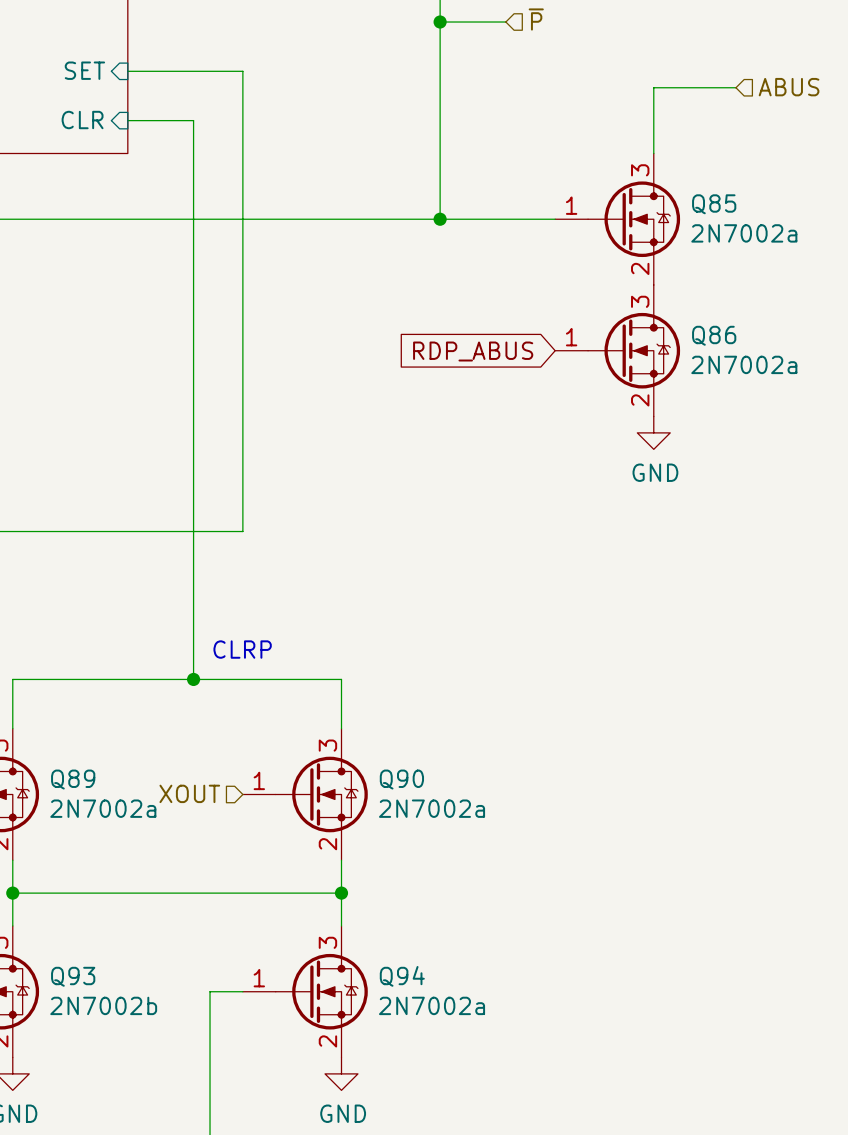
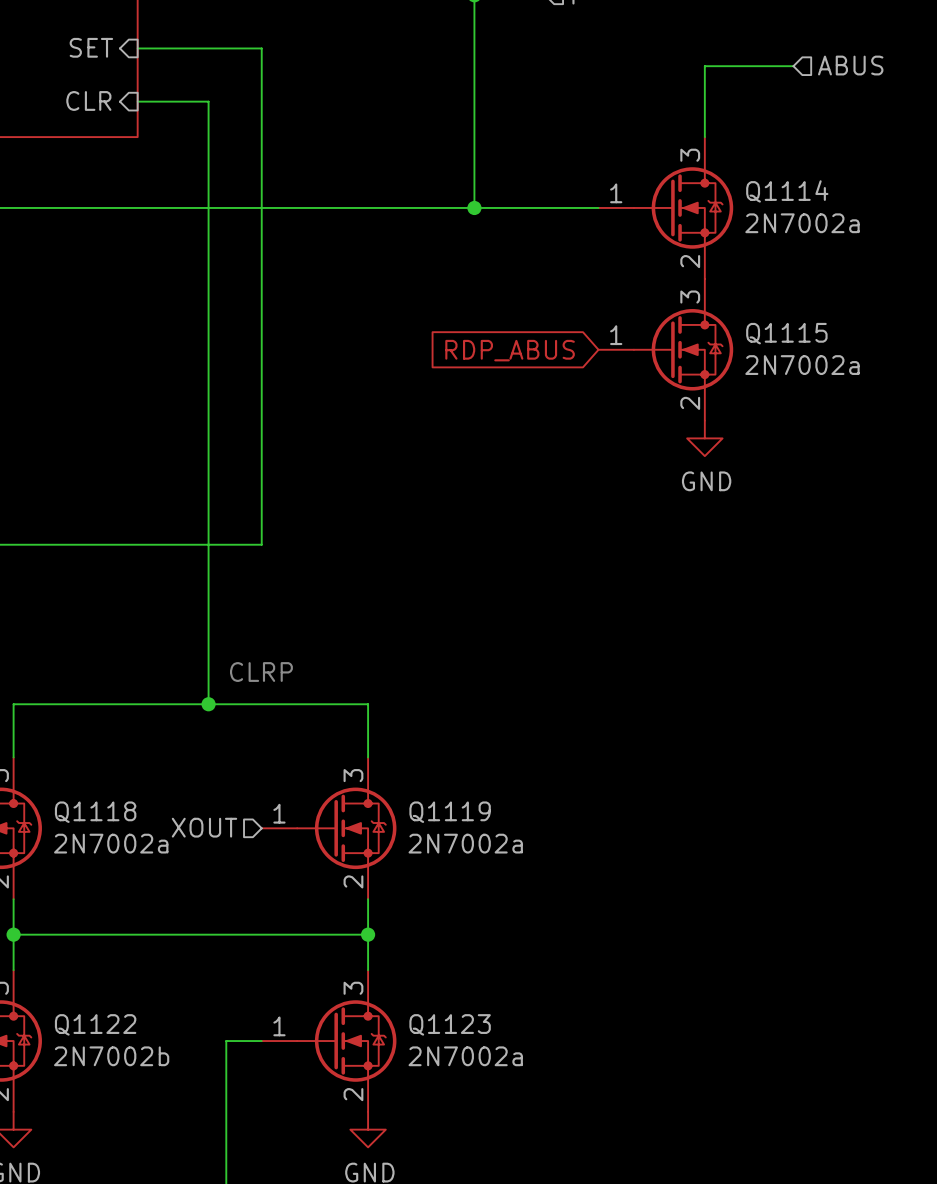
Q85 name: Q85 (714, 204) -> Q1114 (787, 191)
Q86 name: Q86 (714, 335) -> Q1115 (786, 333)
Q89 name: Q89 (73, 779) -> Q1118 (95, 812)
Q90 name: Q90 (401, 779) -> Q1119 (450, 812)
Q93 name: Q93 (73, 976) -> Q1122 (95, 1024)
Q94 name: Q94 (402, 976) -> Q1123 (450, 1024)

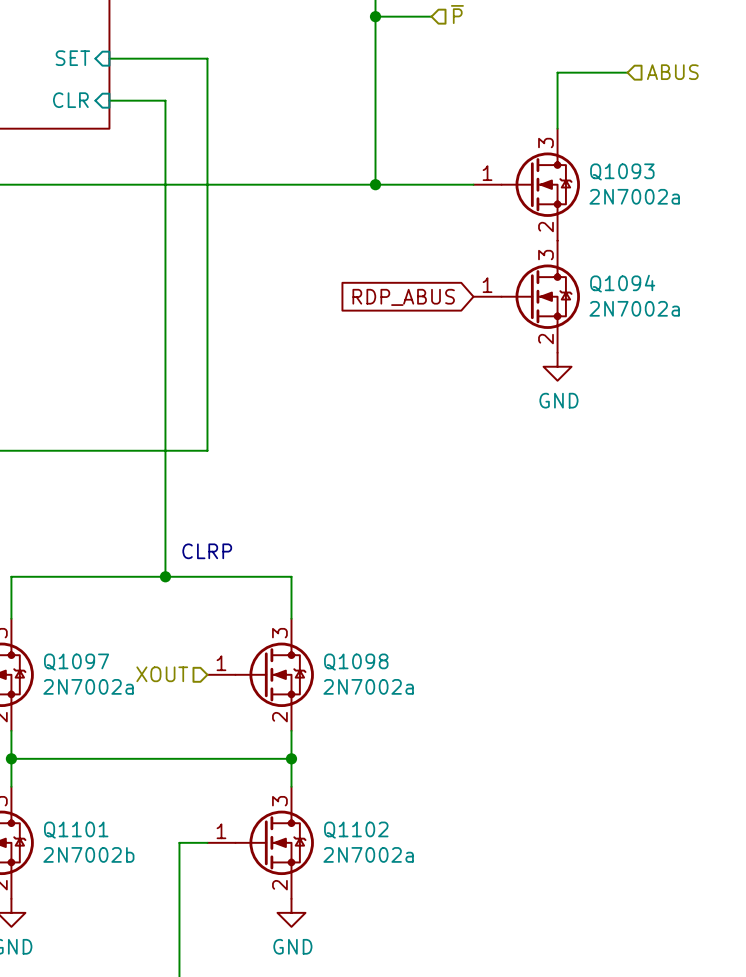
Q1114 name: Q1114 (787, 191) -> Q1093 (622, 171)
Q1115 name: Q1115 (786, 333) -> Q1094 (622, 283)
Q1118 name: Q1118 (95, 812) -> Q1097 (76, 662)
Q1119 name: Q1119 (450, 812) -> Q1098 (356, 662)
Q1122 name: Q1122 (95, 1024) -> Q1101 (76, 830)
Q1123 name: Q1123 (450, 1024) -> Q1102 (356, 830)

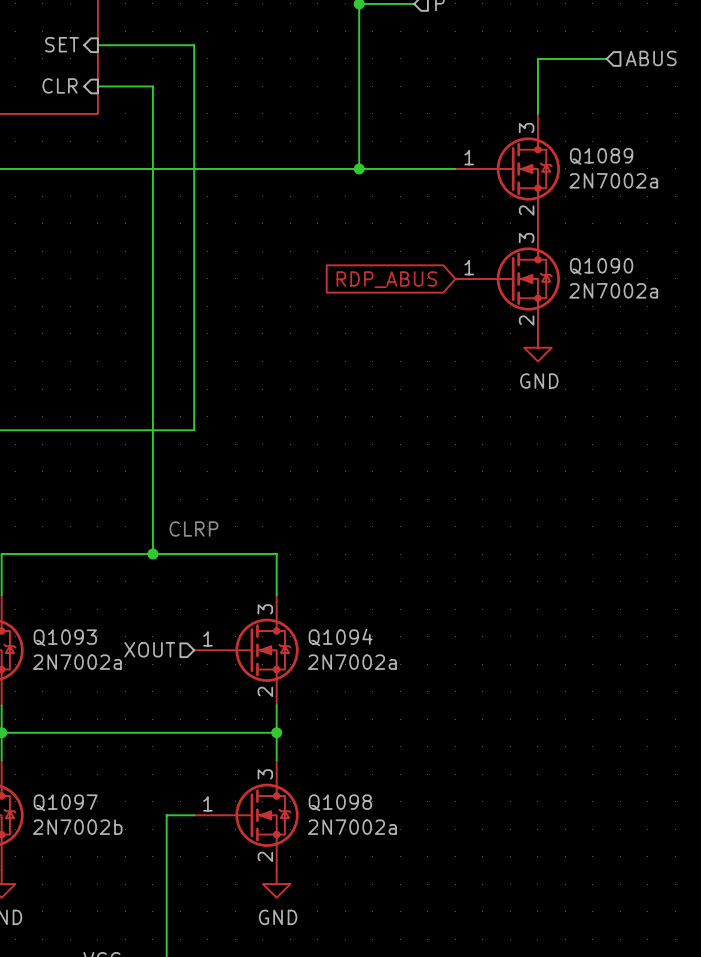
Q1093 name: Q1093 (622, 171) -> Q1089 (601, 156)
Q1094 name: Q1094 (622, 283) -> Q1090 (601, 266)
Q1097 name: Q1097 (76, 662) -> Q1093 (65, 637)
Q1098 name: Q1098 (356, 662) -> Q1094 (340, 637)
Q1101 name: Q1101 (76, 830) -> Q1097 (65, 802)
Q1102 name: Q1102 (356, 830) -> Q1098 (340, 802)

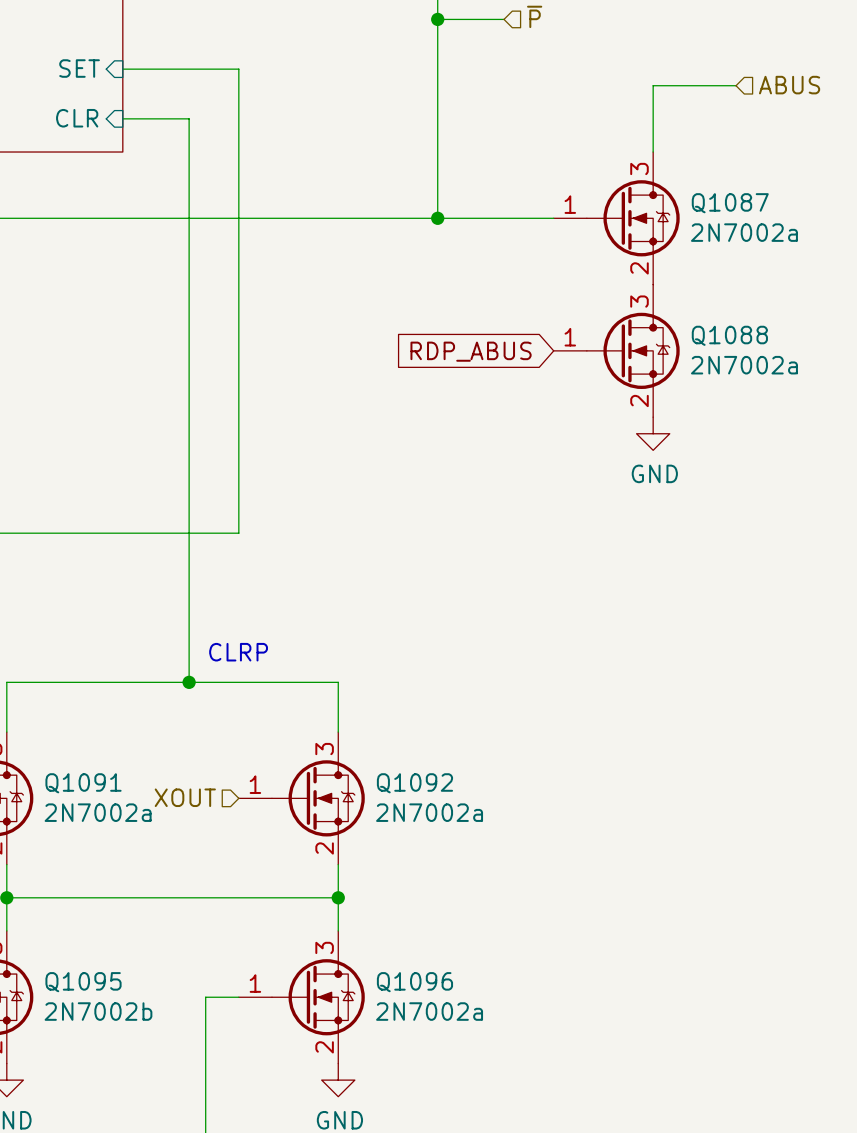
Q1089 name: Q1089 (601, 156) -> Q1087 (730, 203)
Q1090 name: Q1090 (601, 266) -> Q1088 (729, 335)
Q1093 name: Q1093 (65, 637) -> Q1091 (83, 783)
Q1094 name: Q1094 (340, 637) -> Q1092 (414, 783)
Q1097 name: Q1097 (65, 802) -> Q1095 (83, 982)
Q1098 name: Q1098 (340, 802) -> Q1096 (414, 982)

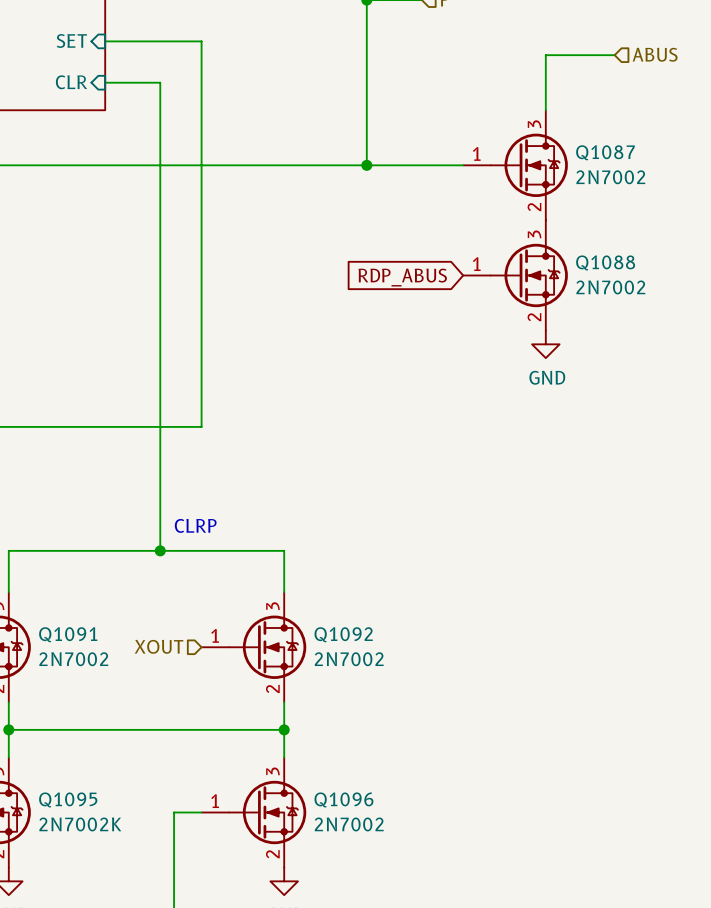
Q1087 value: 2N7002a (744, 232) -> 2N7002 (610, 177)
Q1088 value: 2N7002a (744, 365) -> 2N7002 (610, 287)
Q1091 value: 2N7002a (98, 812) -> 2N7002 (73, 659)
Q1092 value: 2N7002a (429, 812) -> 2N7002 (349, 659)
Q1095 value: 2N7002b (98, 1011) -> 2N7002K (80, 824)
Q1096 value: 2N7002a (429, 1011) -> 2N7002 (349, 824)

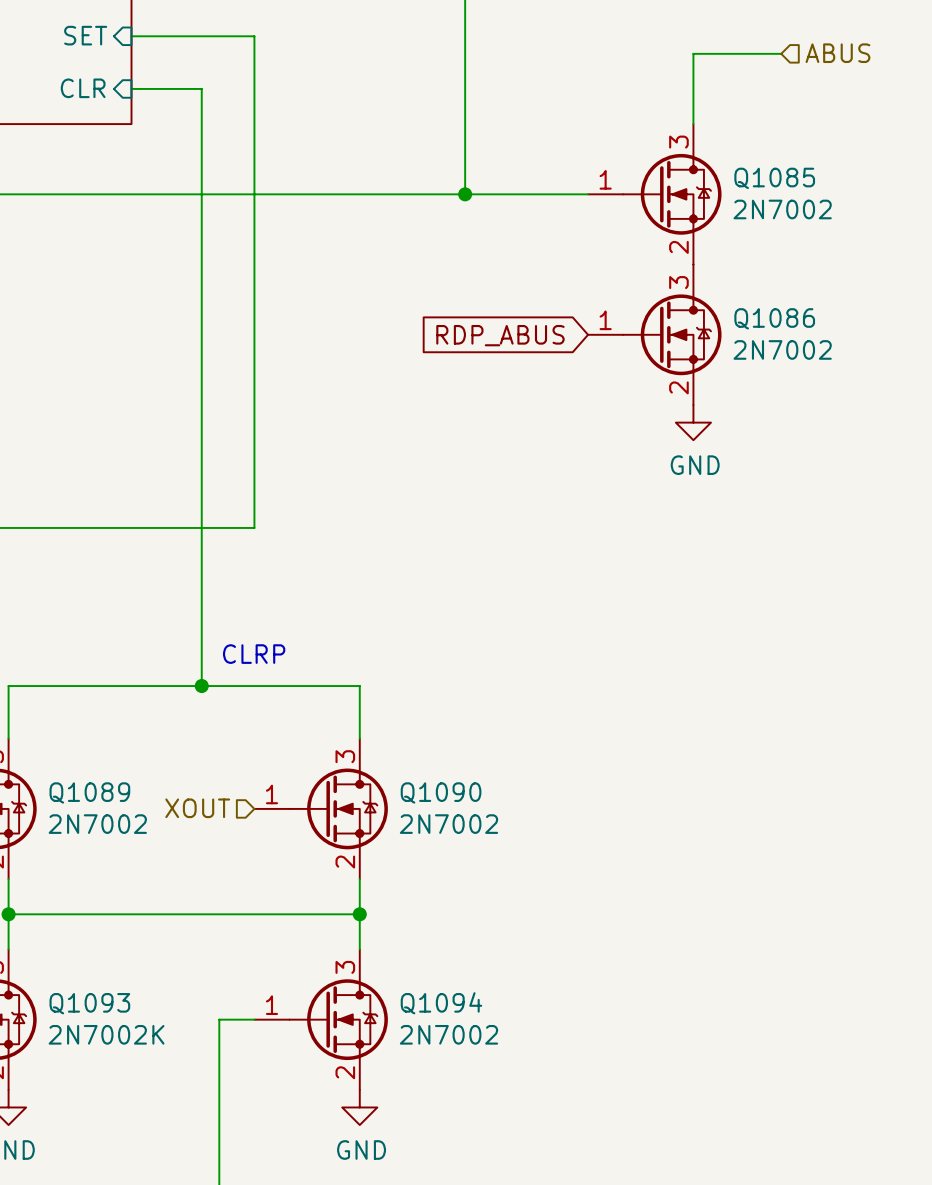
Q1087 name: Q1087 (605, 152) -> Q1085 (774, 178)
Q1088 name: Q1088 (605, 262) -> Q1086 (774, 318)
Q1091 name: Q1091 (68, 634) -> Q1089 (89, 792)
Q1092 name: Q1092 (343, 634) -> Q1090 (441, 792)
Q1095 name: Q1095 (68, 799) -> Q1093 (89, 1003)
Q1096 name: Q1096 (343, 799) -> Q1094 (441, 1003)

